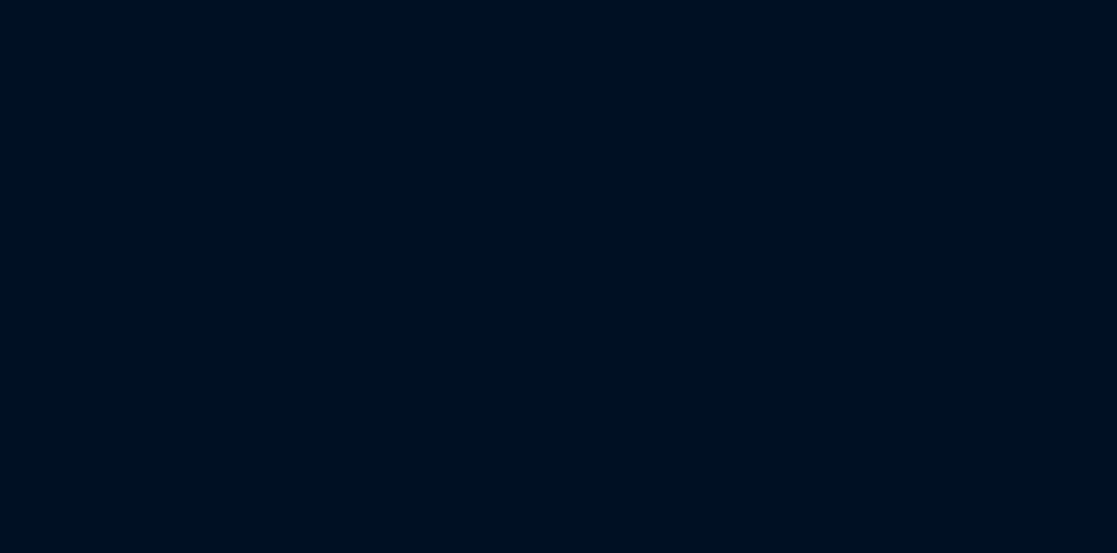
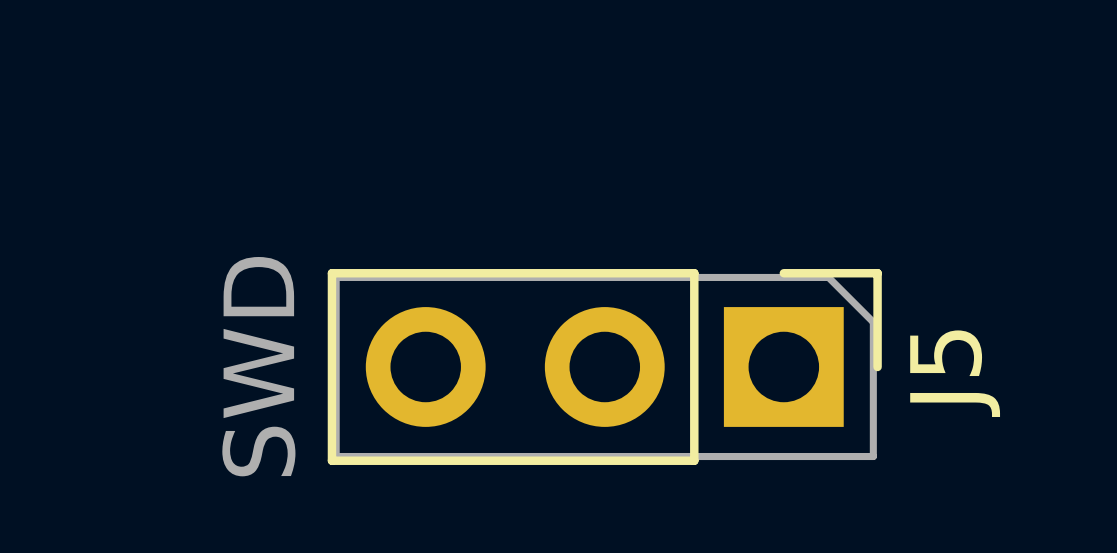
J5: none -> SWD (604, 366)

